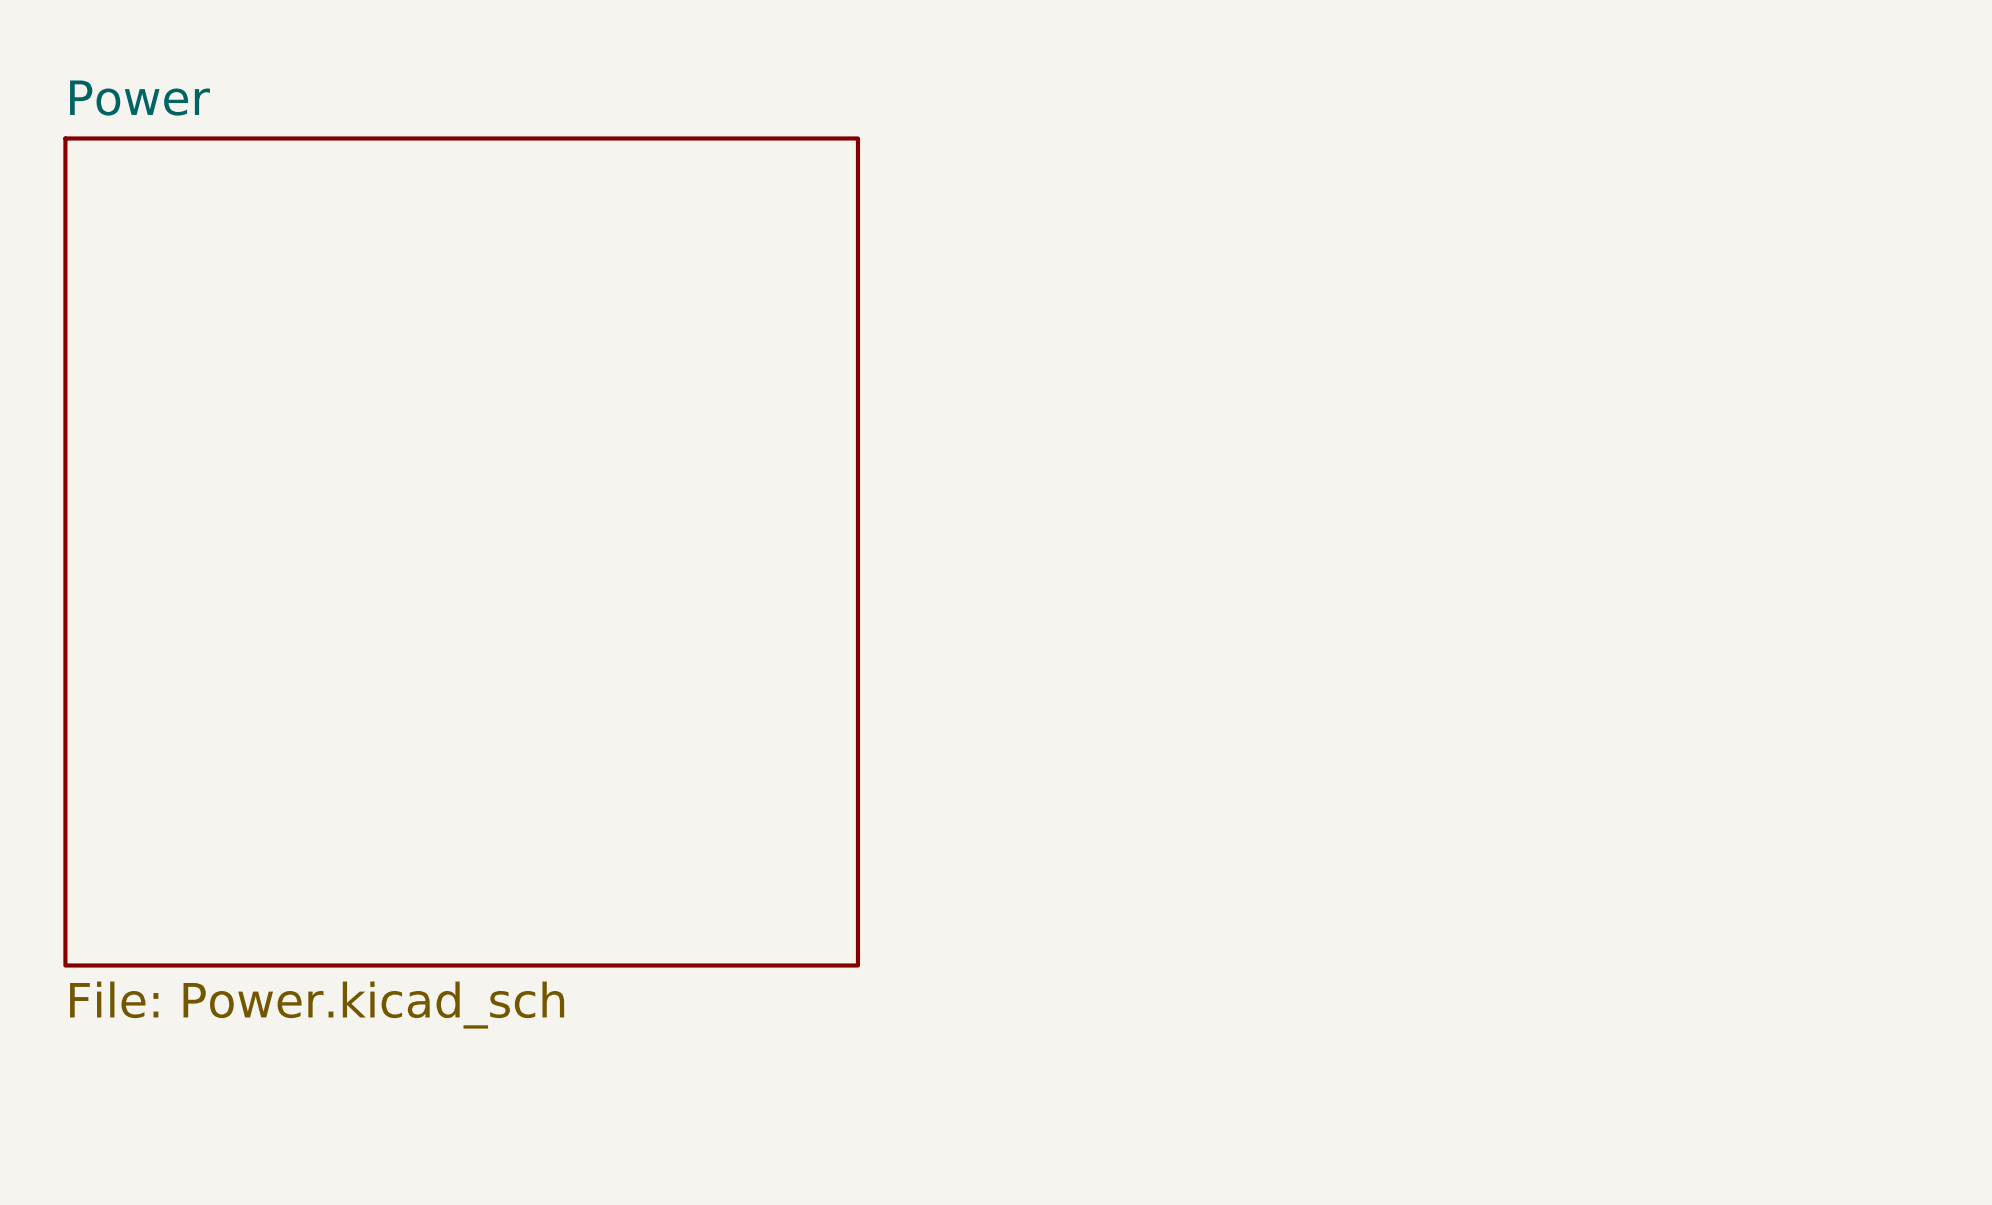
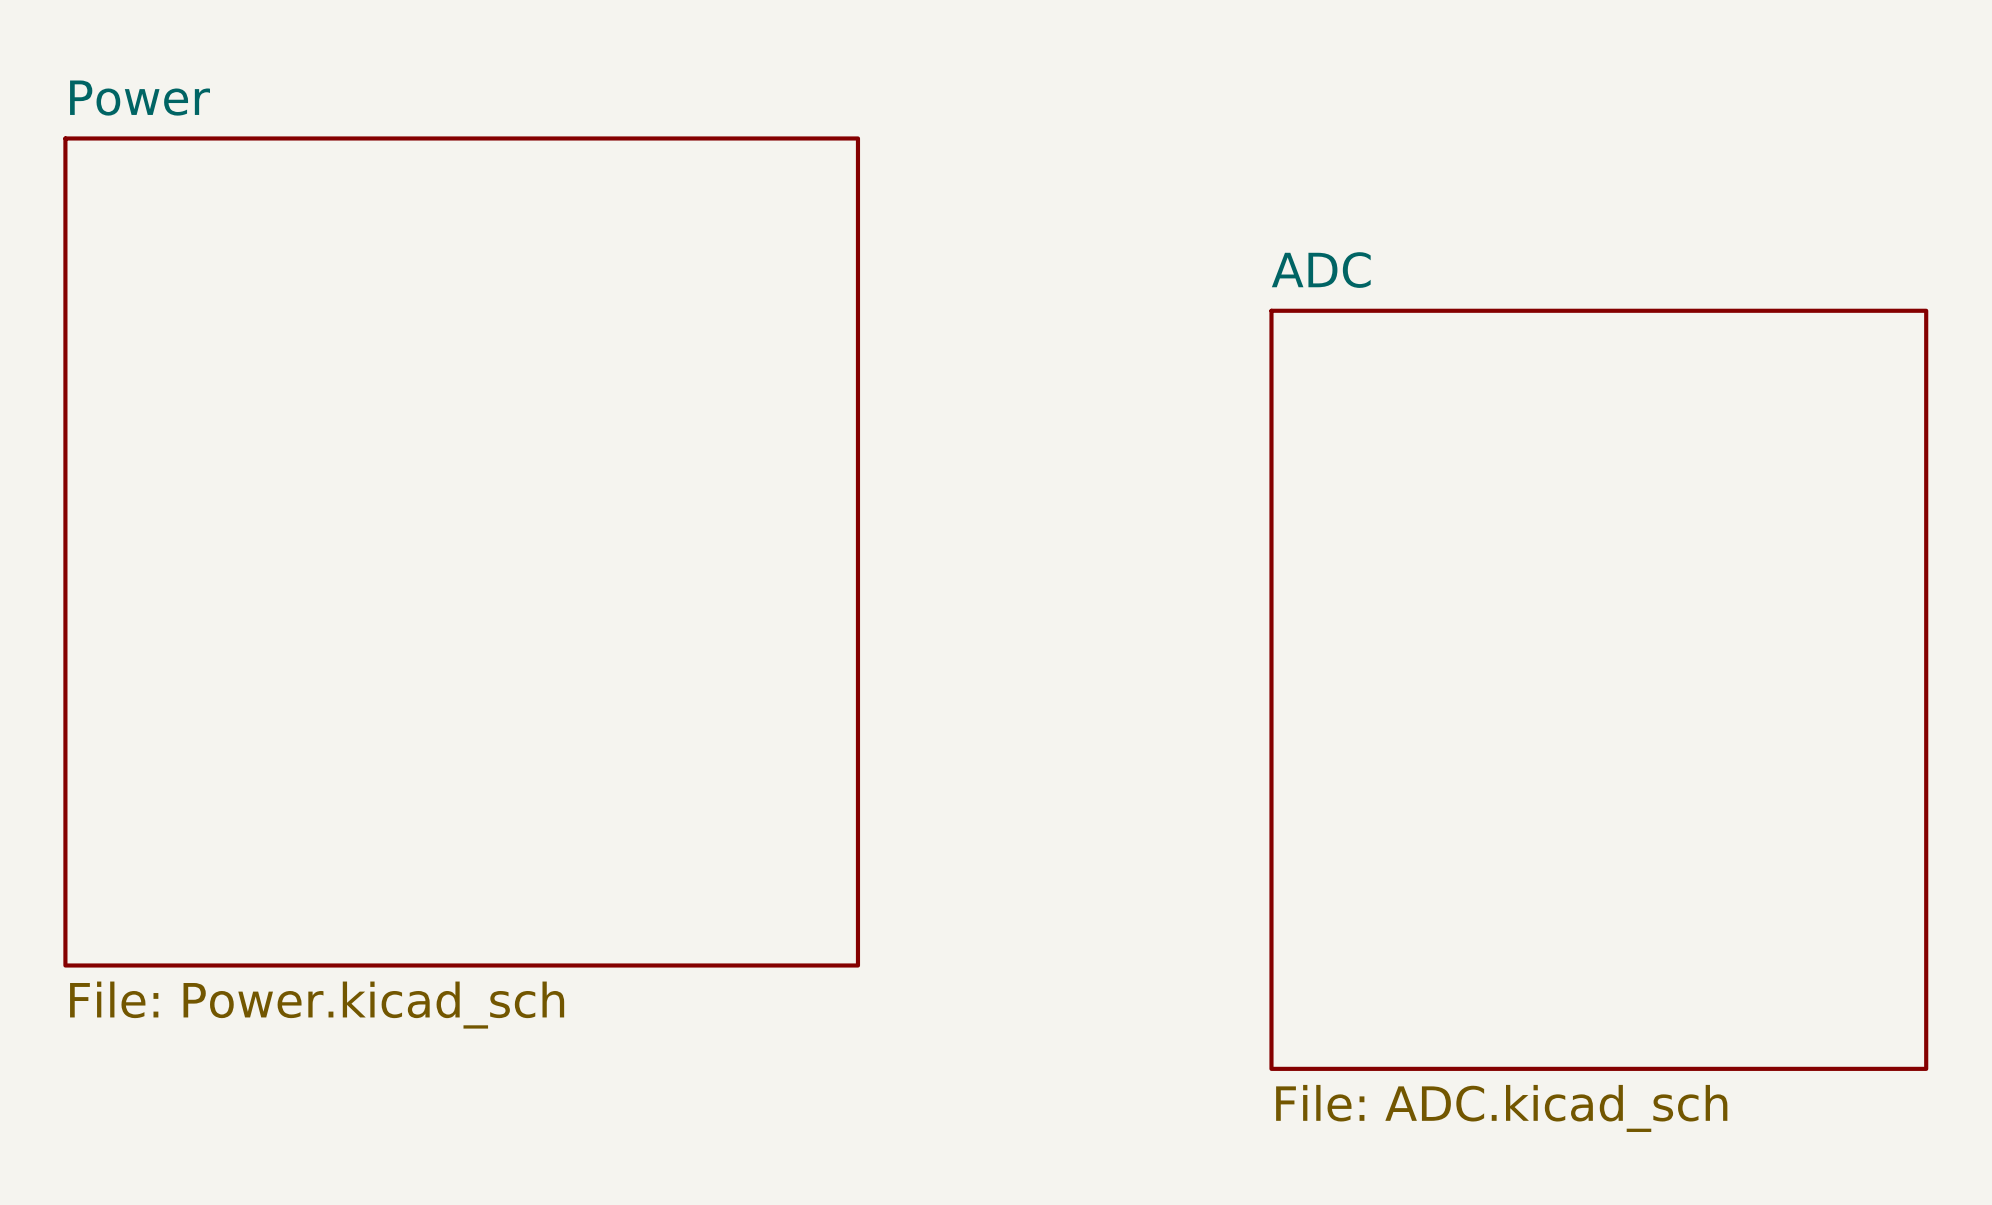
sheet ADC: none -> File: ADC.kicad_sch (1598, 689)

